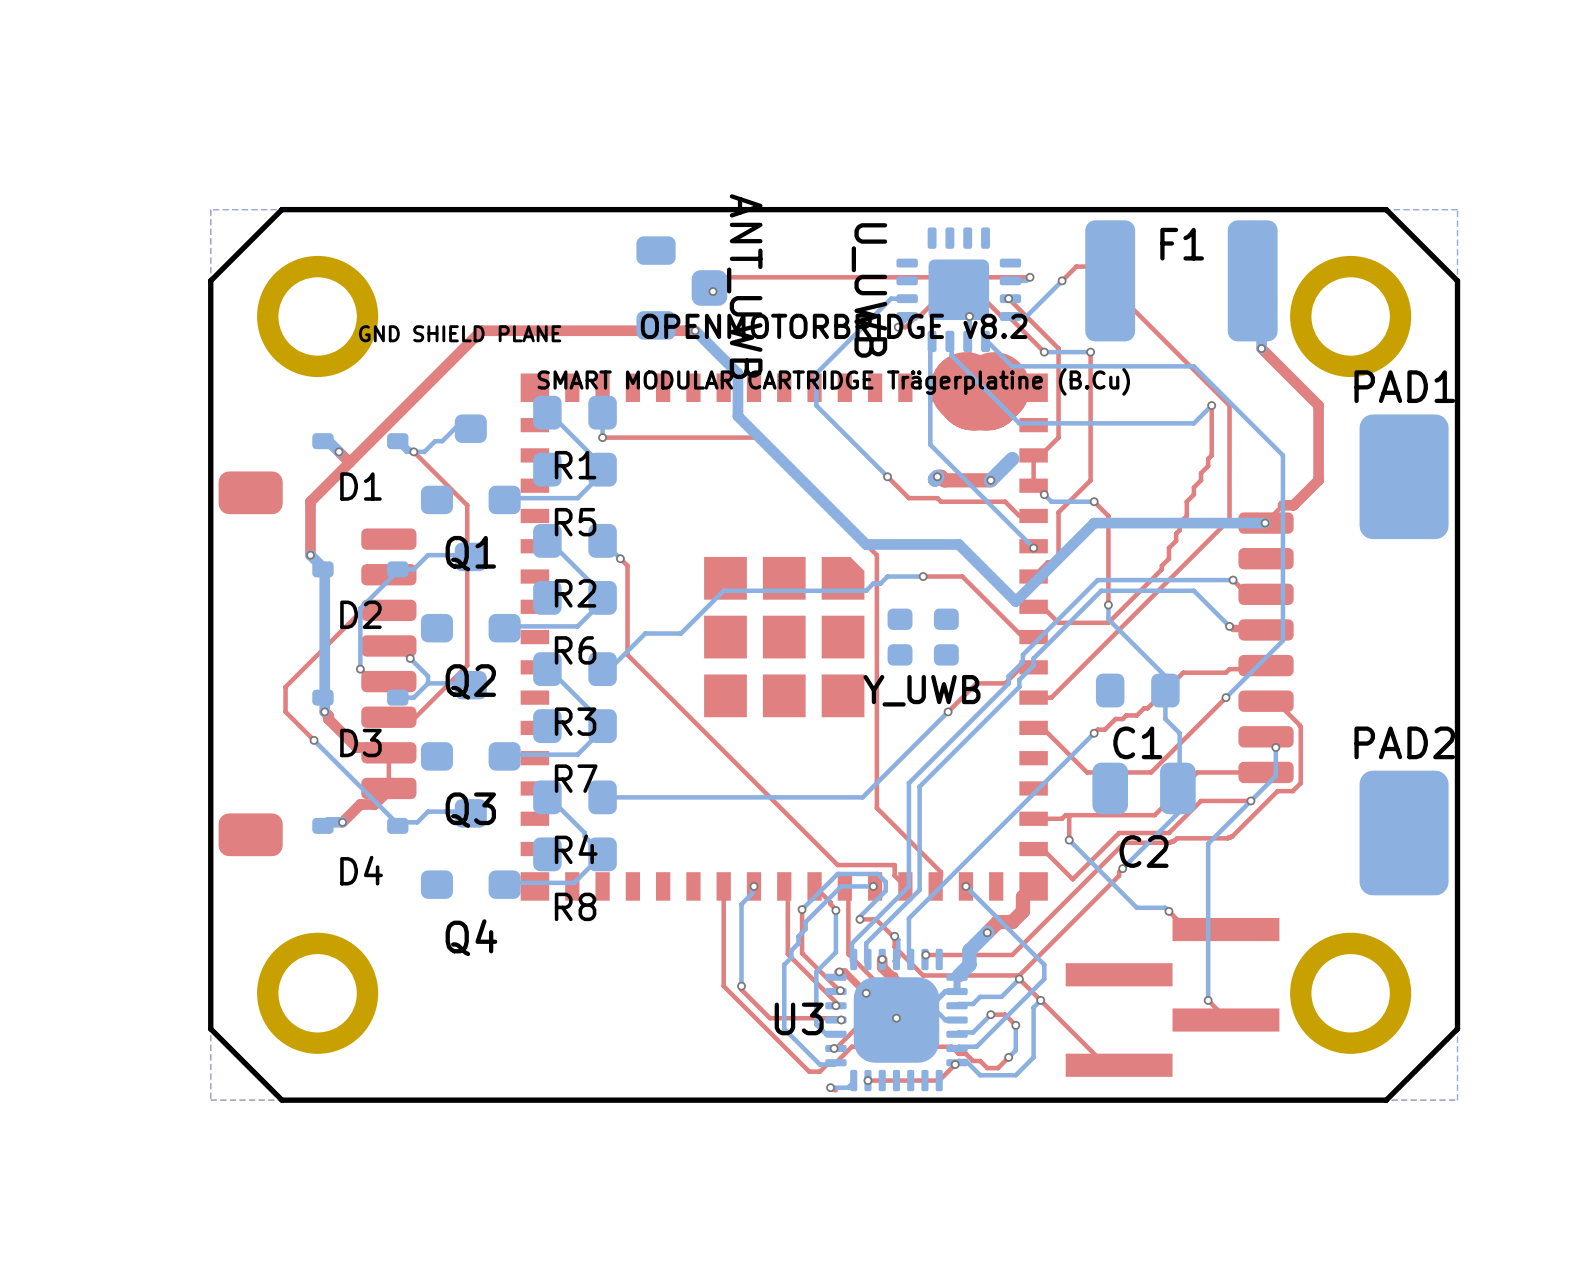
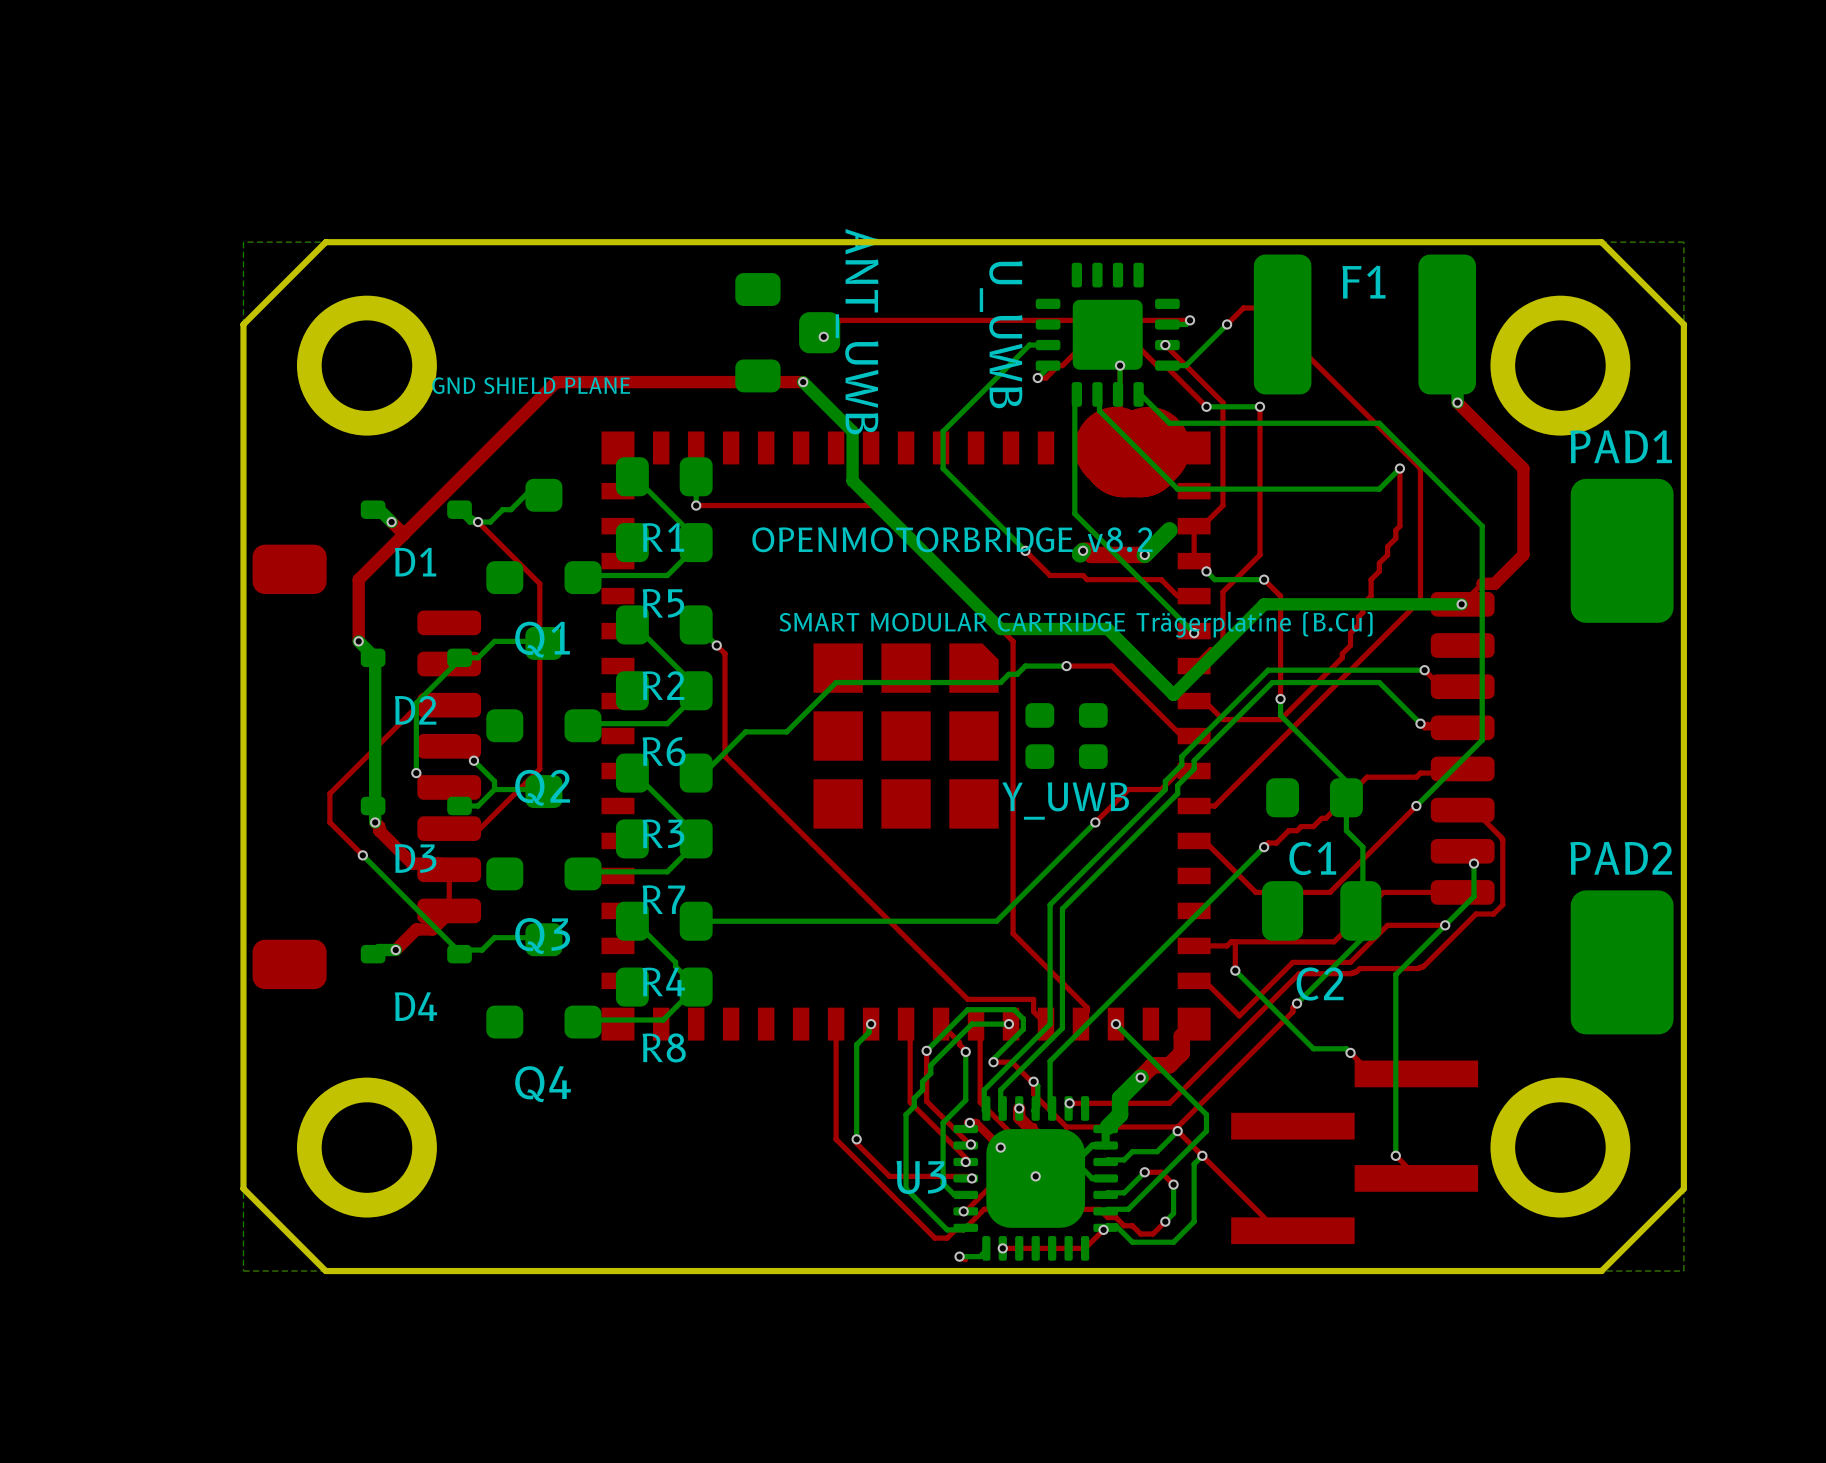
text position: OPENMOTORBRIDGE v8.2 (834, 326) -> OPENMOTORBRIDGE v8.2 (952, 539)
text position: SMART MODULAR CARTRIDGE Trägerplatine (B.Cu) (833, 381) -> SMART MODULAR CARTRIDGE Trägerplatine (B.Cu) (1076, 624)

